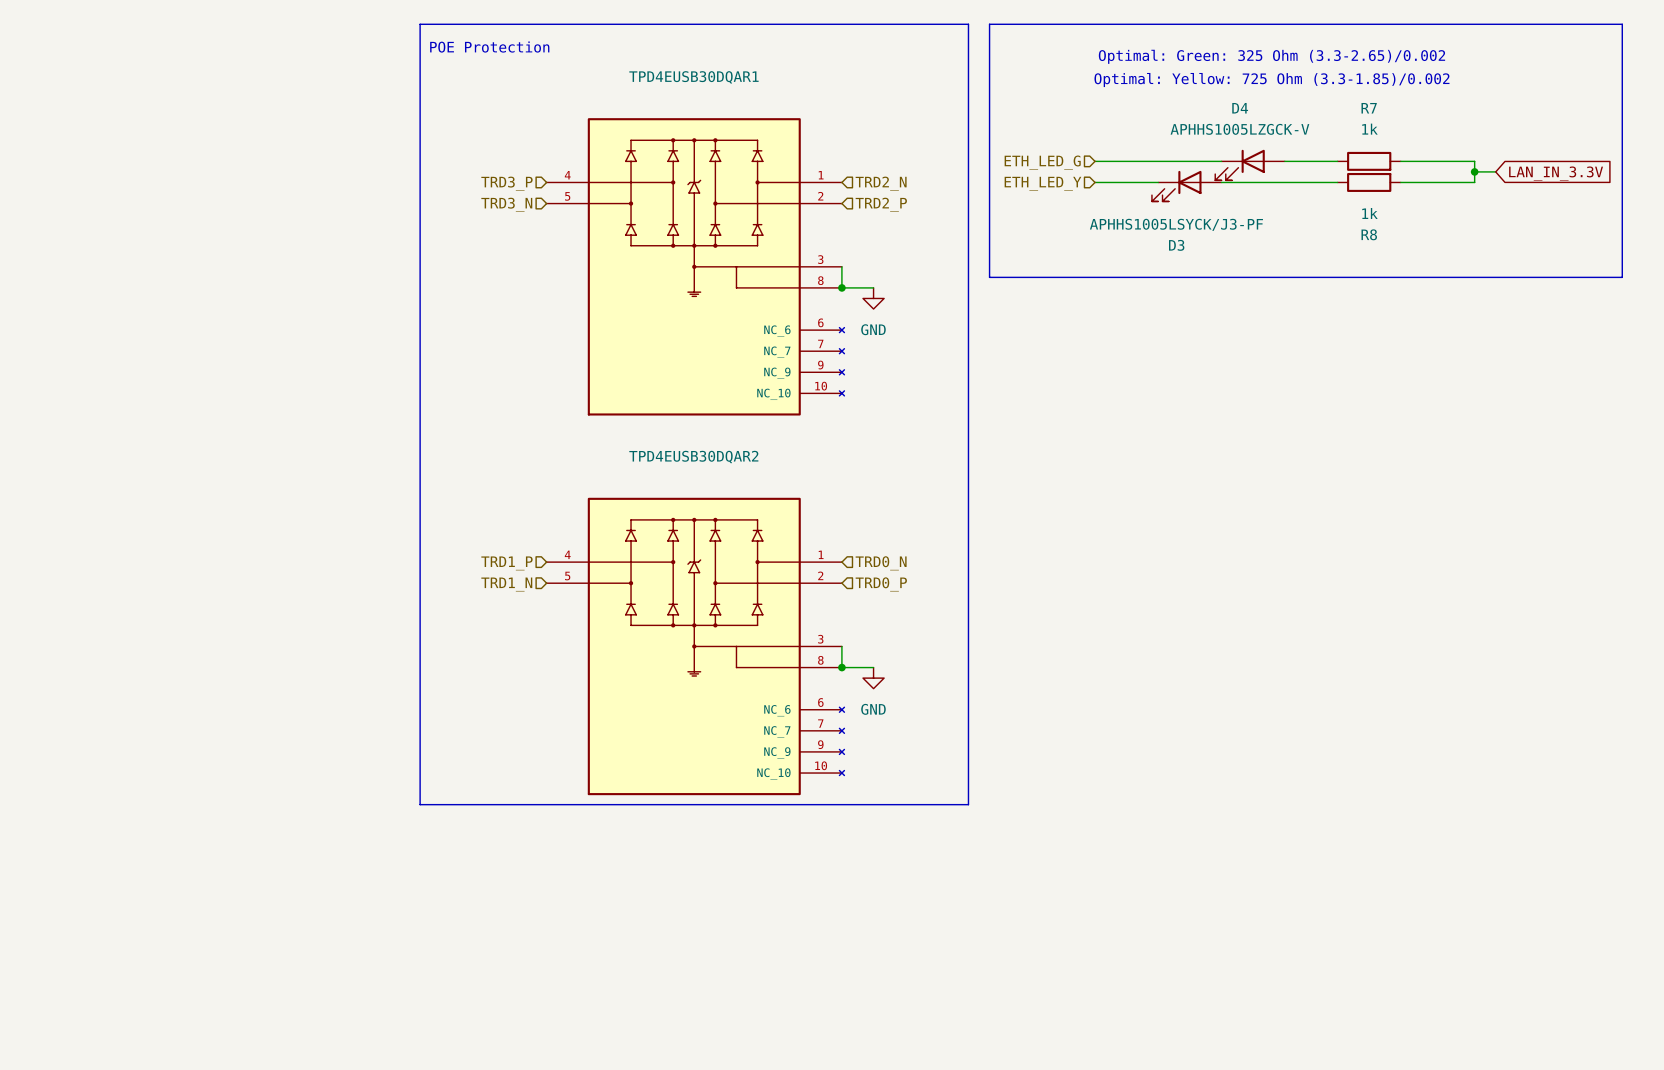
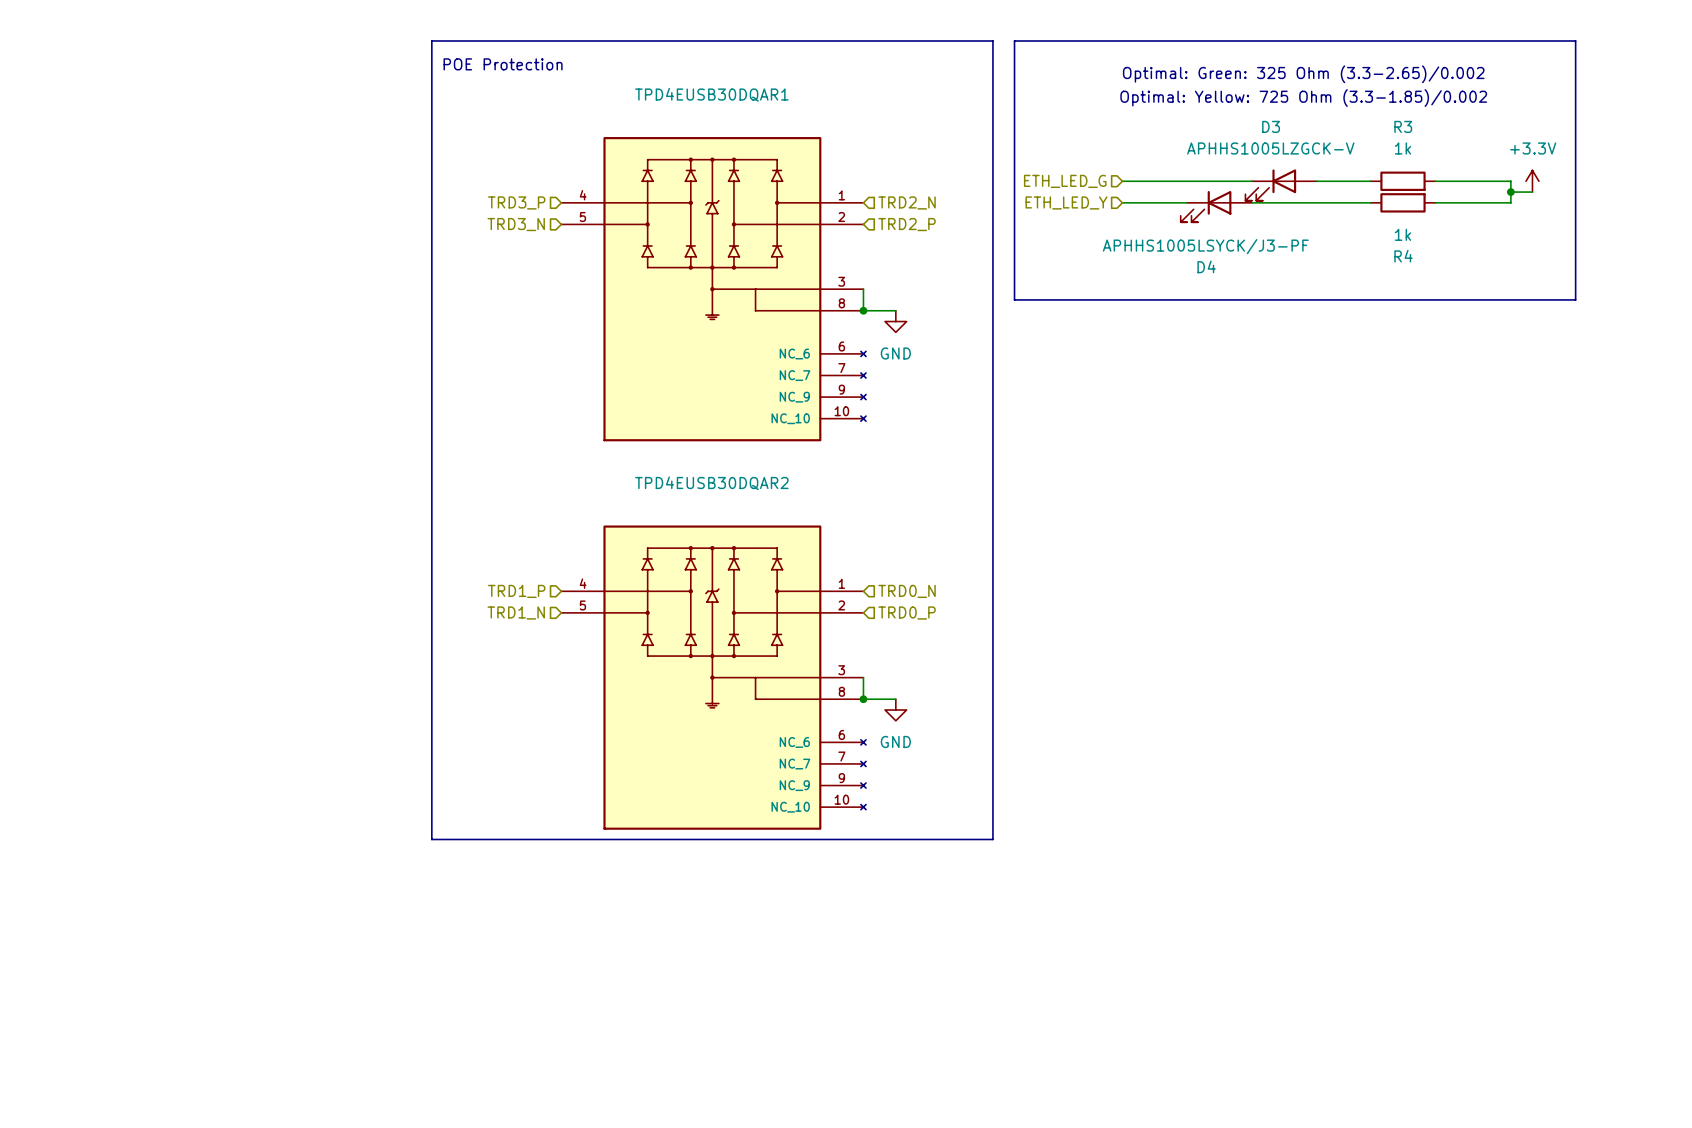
line: (1537, 24) (1622, 24) (1622, 277) (1537, 277) -> (1575, 40) (1575, 299)
D4 name: D4 (1240, 108) -> D3 (1271, 126)
R7 name: R7 (1369, 108) -> R3 (1403, 126)
power symbol: none -> +3.3V (1532, 181)
global label: LAN_IN_3.3V (1556, 173) -> none
R8 name: R8 (1369, 234) -> R4 (1403, 256)
D3 name: D3 (1176, 245) -> D4 (1206, 266)

